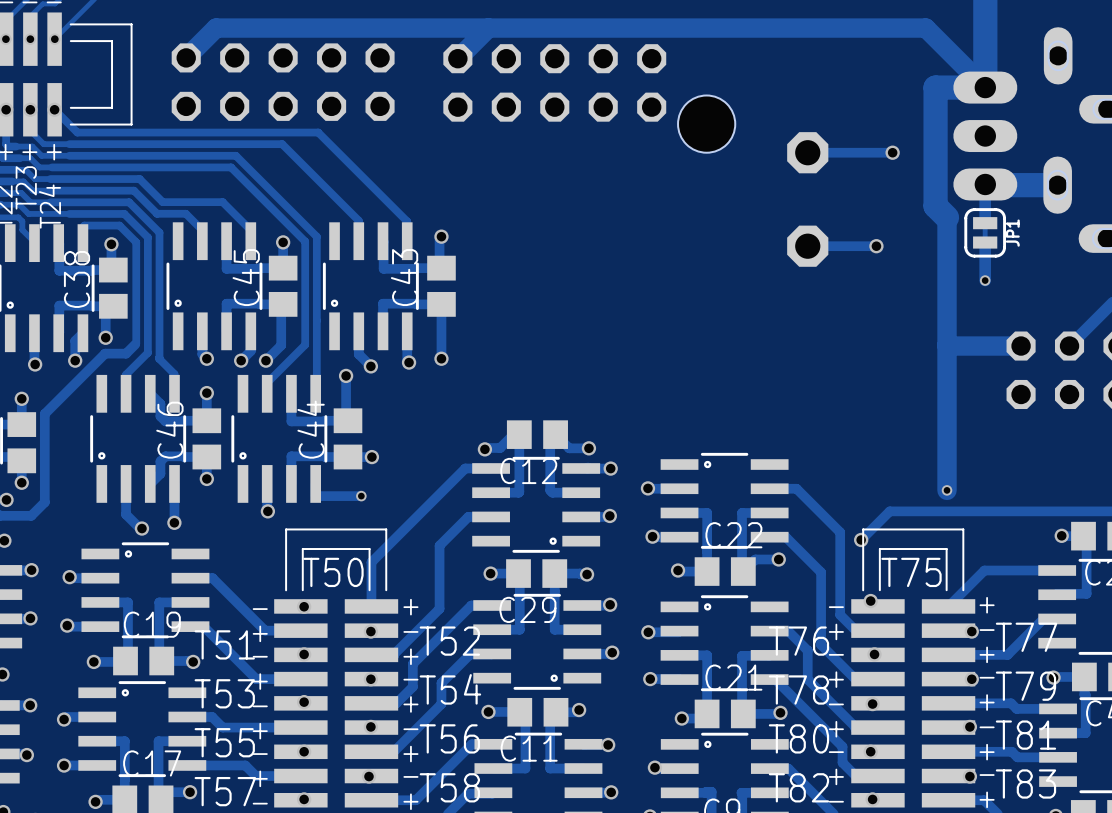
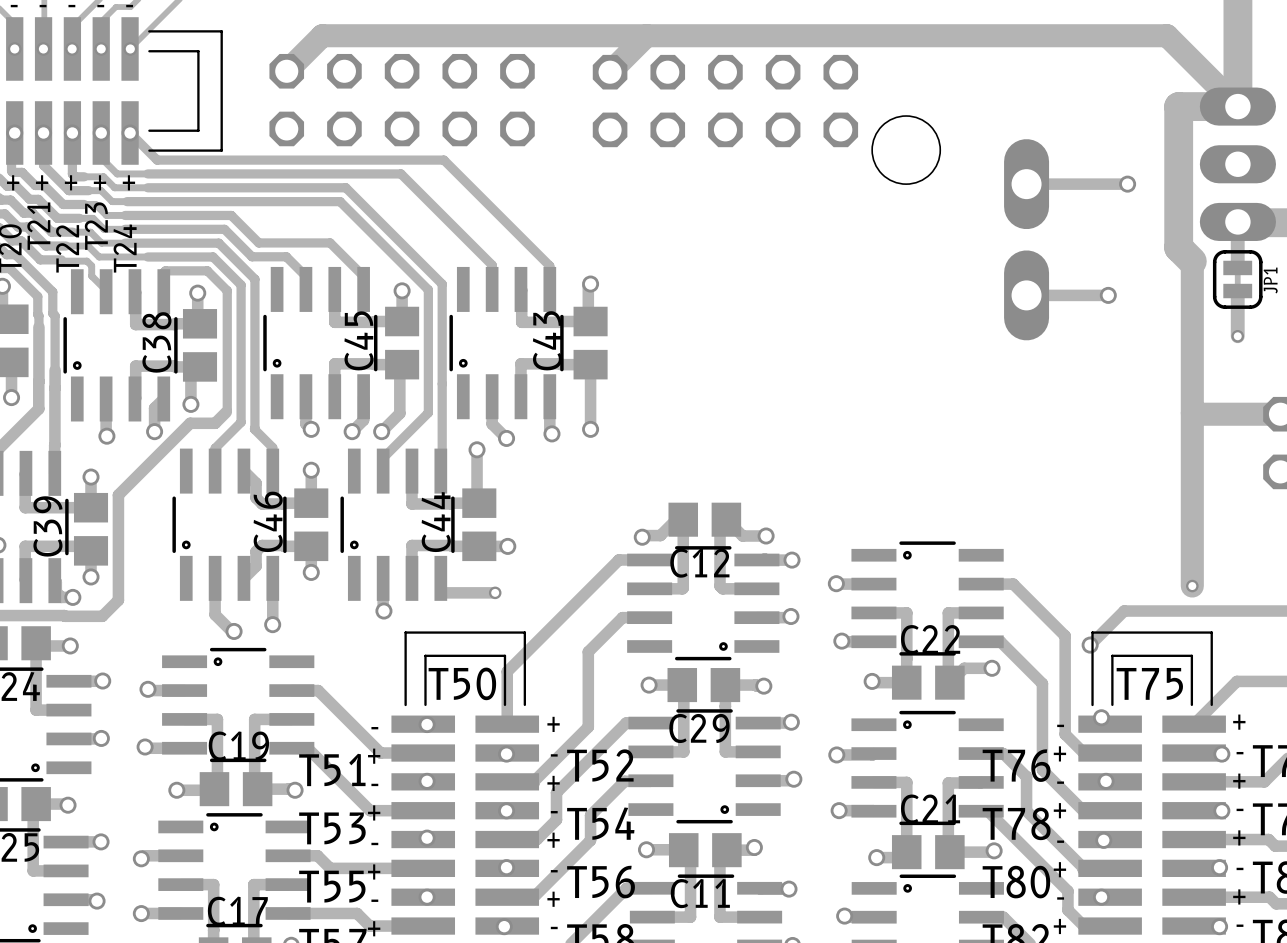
part footprint: [787, 132, 829, 174] -> [1004, 139, 1050, 230]
part footprint: [787, 225, 829, 267] -> [1004, 250, 1050, 341]

